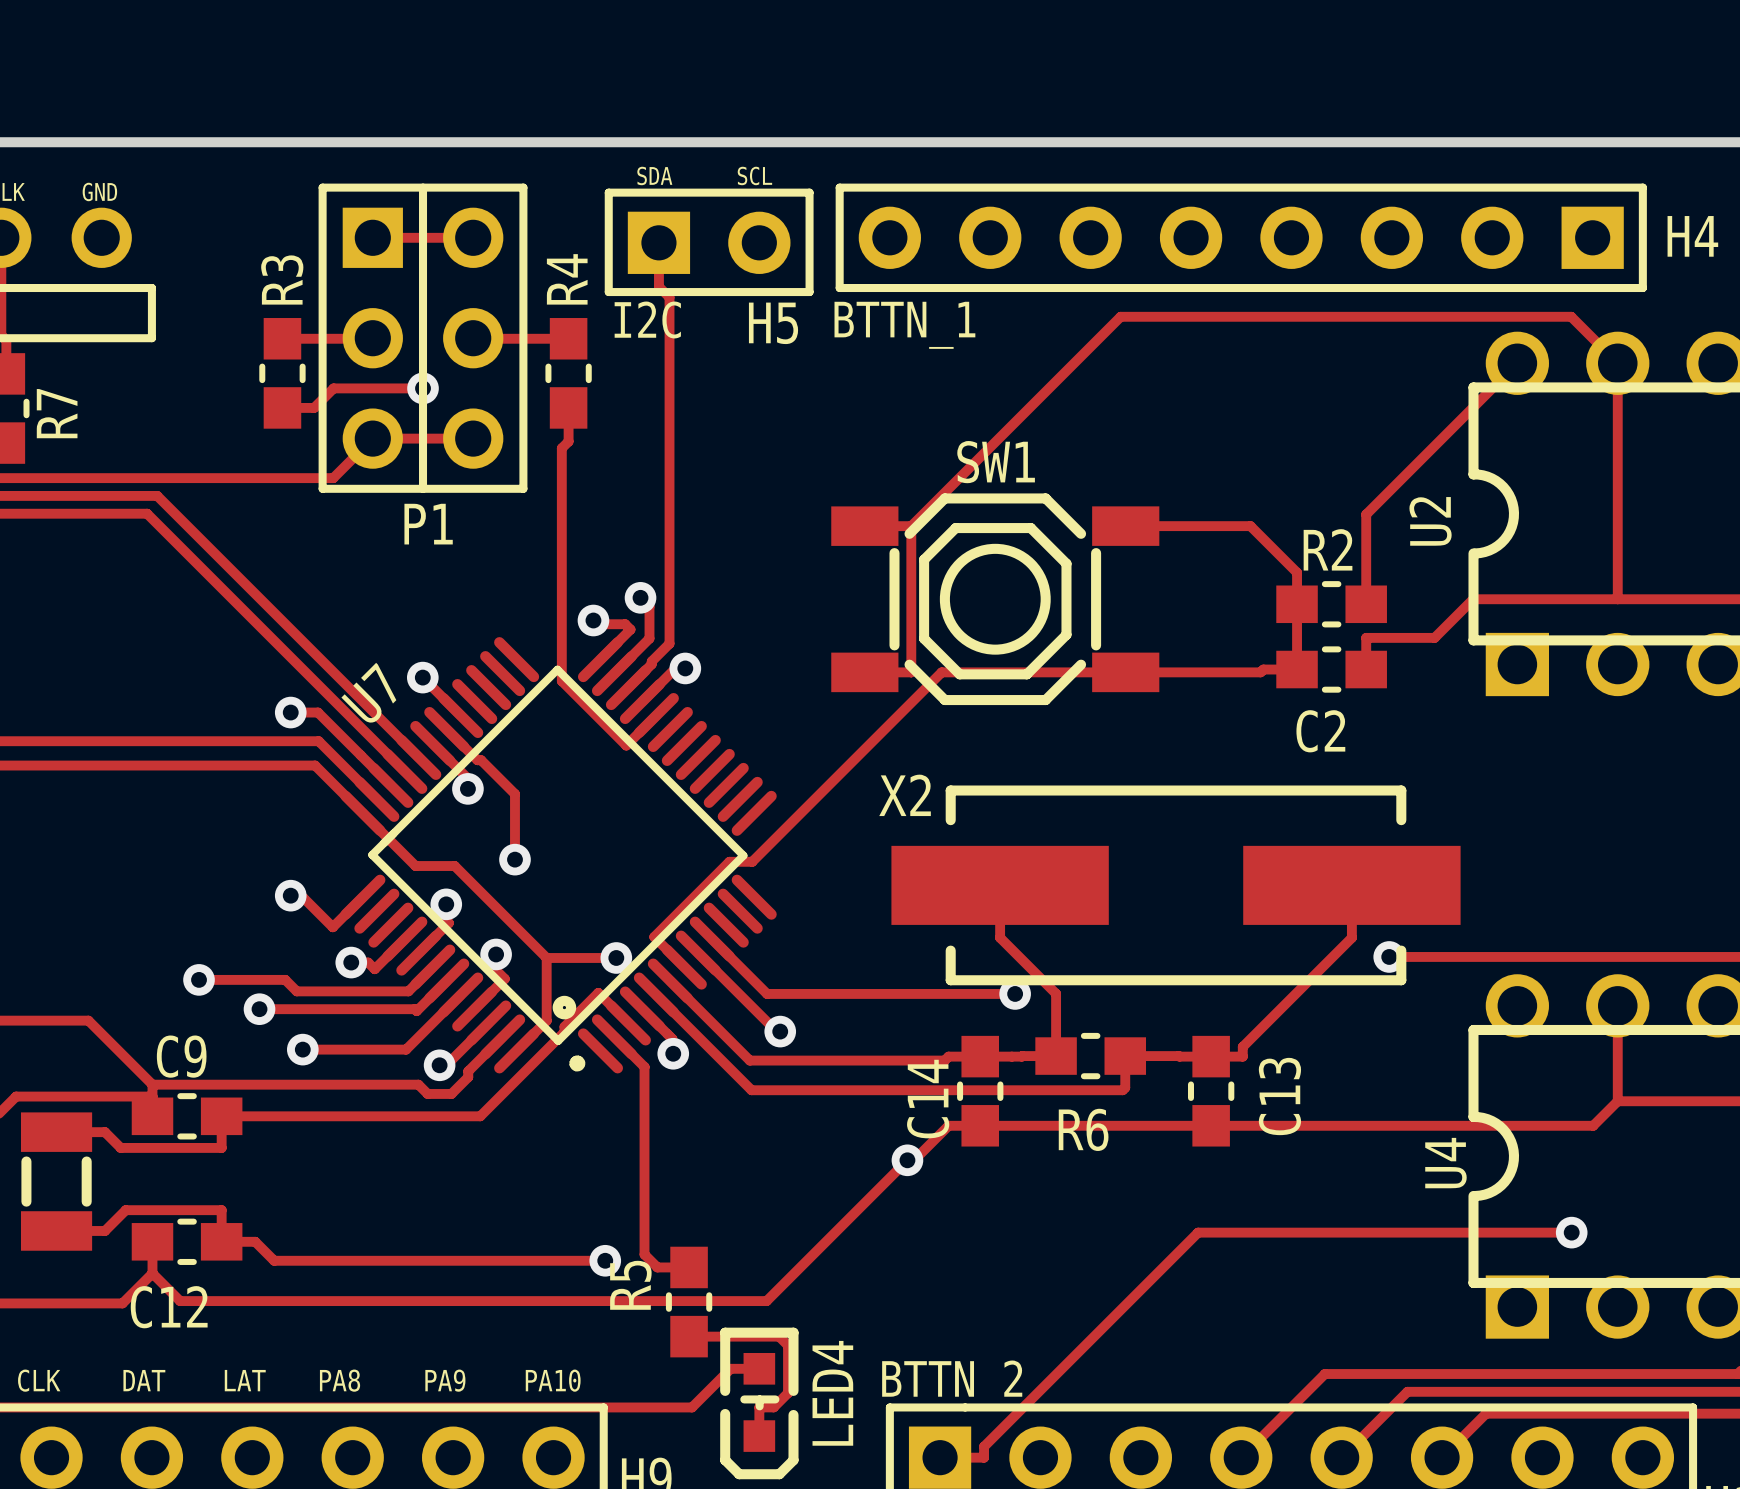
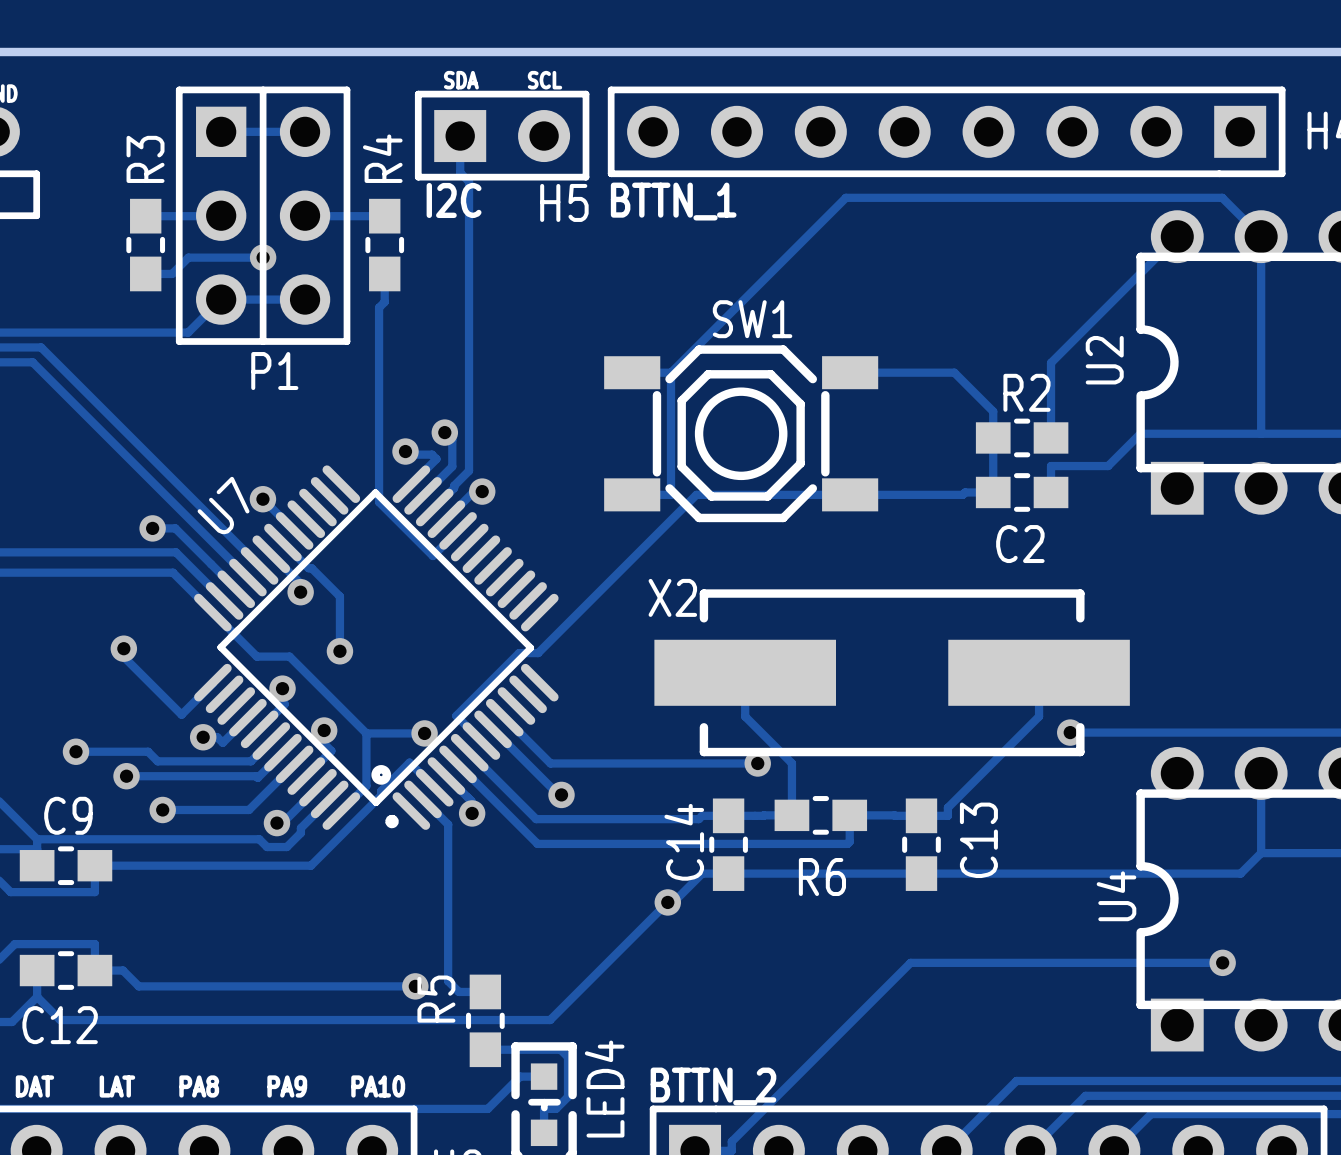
track: (290, 895) (303, 897) (332, 927) (362, 897) -> (126, 648) (123, 648) (123, 656) (181, 714) (212, 682)
via position: (290, 895) -> (123, 648)

